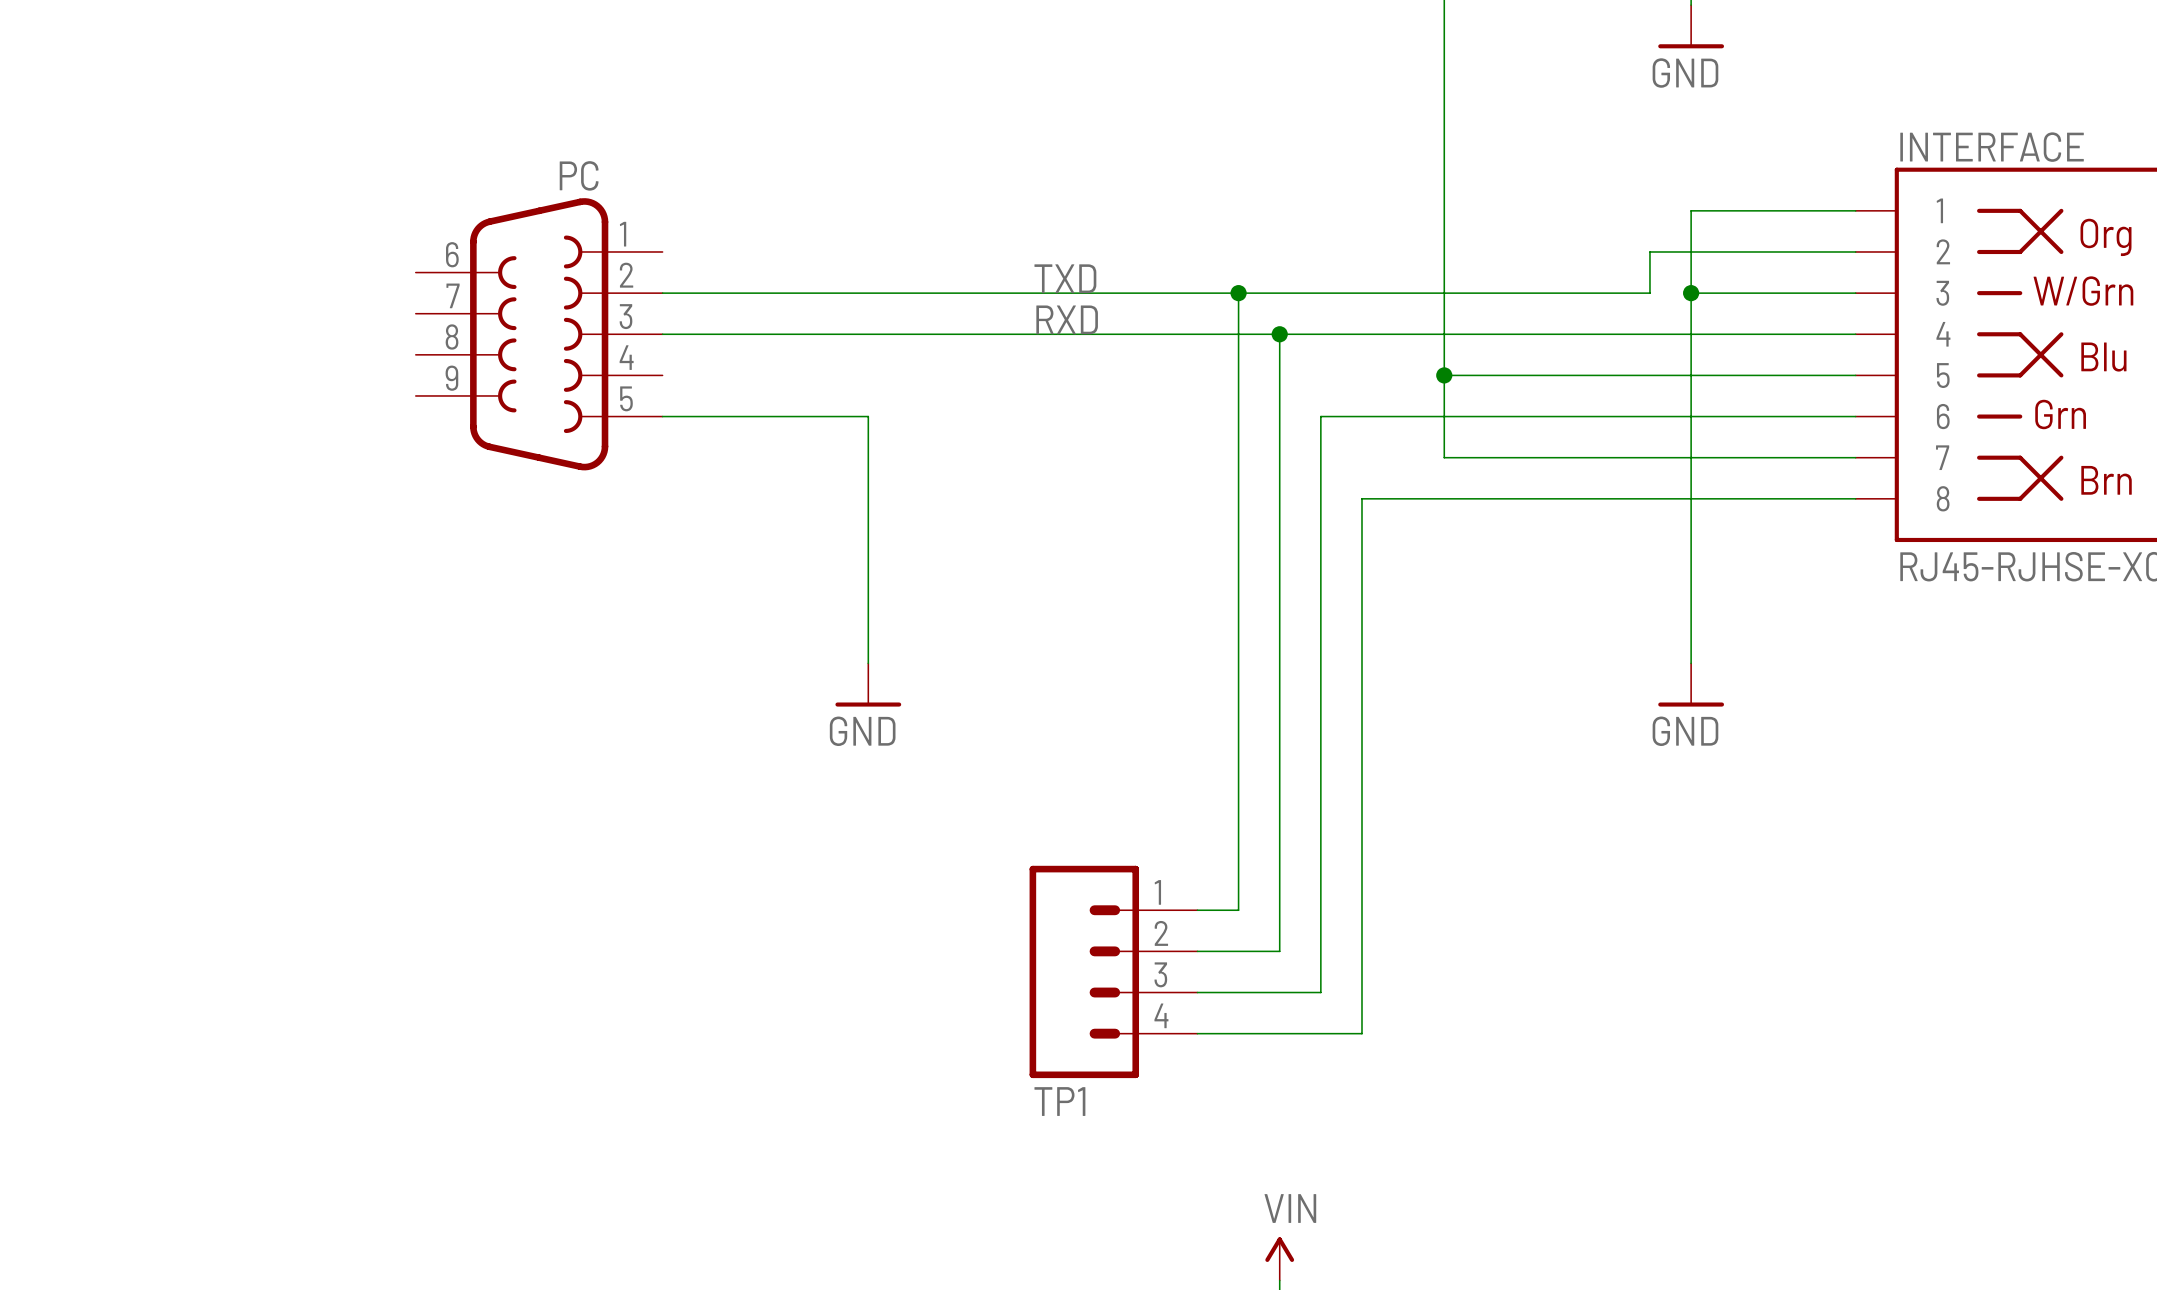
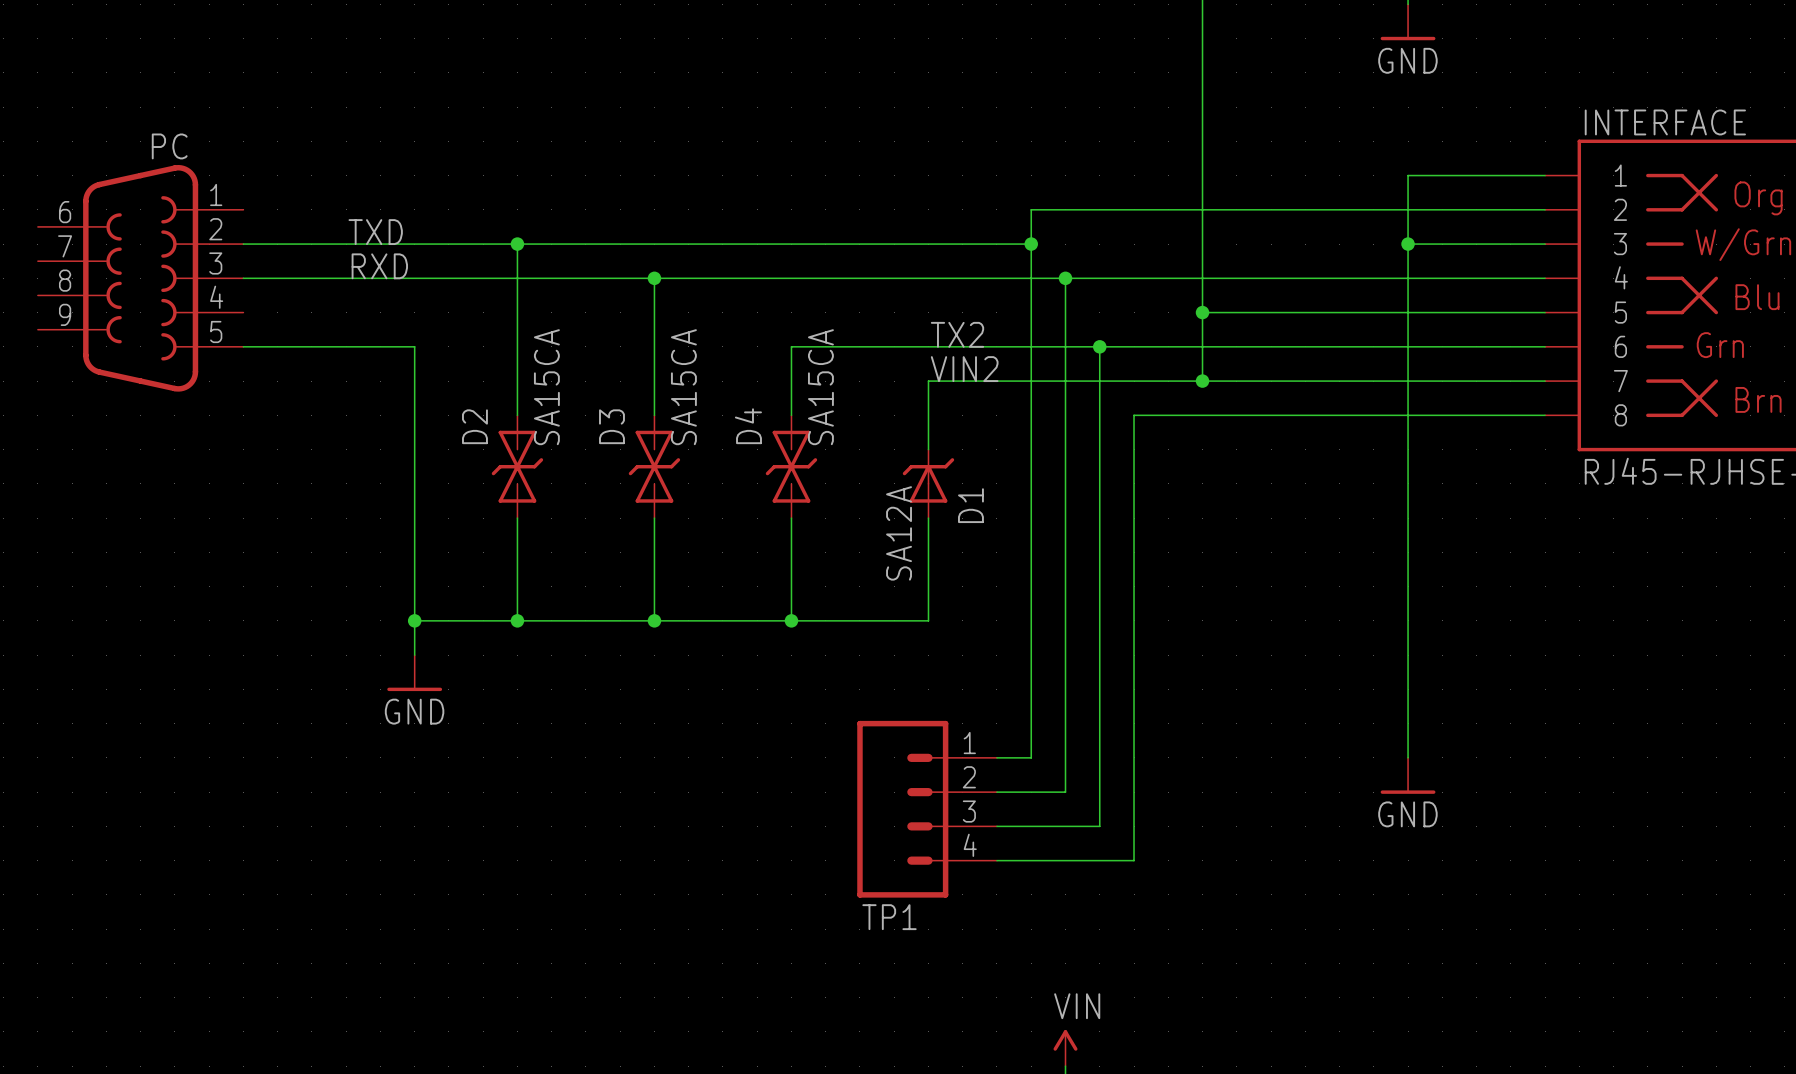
wire: (1649, 251) (1649, 293) (1238, 293) -> (1373, 209) (1031, 209) (1031, 244)
label: none -> TXD (375, 232)
label: TXD (1065, 278) -> none
wire: none -> (243, 244) (551, 244)
wire: none -> (517, 244) (517, 415)
junction: none -> (517, 244)
label: none -> RXD (379, 266)
label: RXD (1067, 319) -> none
wire: none -> (243, 278) (551, 278)
PC position: (539, 334) -> (140, 278)
wire: none -> (654, 278) (654, 415)
junction: none -> (654, 278)
label: none -> TX2 (957, 334)
wire: none -> (243, 346) (414, 346) (414, 655)
wire: (662, 416) (868, 416) (868, 663) -> none
wire: none -> (1099, 346) (791, 346) (791, 415)
junction: none -> (1099, 346)
label: none -> VIN2 (964, 369)
wire: none -> (1202, 381) (928, 381) (928, 449)
junction: none -> (1202, 381)
D2: none -> SA15CA (517, 466)
D3: none -> SA15CA (654, 466)
D4: none -> SA15CA (791, 466)
D1: none -> SA12A (928, 483)
wire: none -> (517, 518) (517, 620)
wire: none -> (654, 518) (654, 620)
wire: none -> (791, 518) (791, 620)
wire: none -> (928, 518) (928, 620) (414, 620)
wire: none -> (1408, 552) (1408, 757)
power symbol position: GND (868, 684) -> GND (414, 673)
power symbol position: GND (1691, 684) -> GND (1408, 775)
junction: none -> (414, 620)
junction: none -> (517, 620)
junction: none -> (654, 620)
junction: none -> (791, 620)

